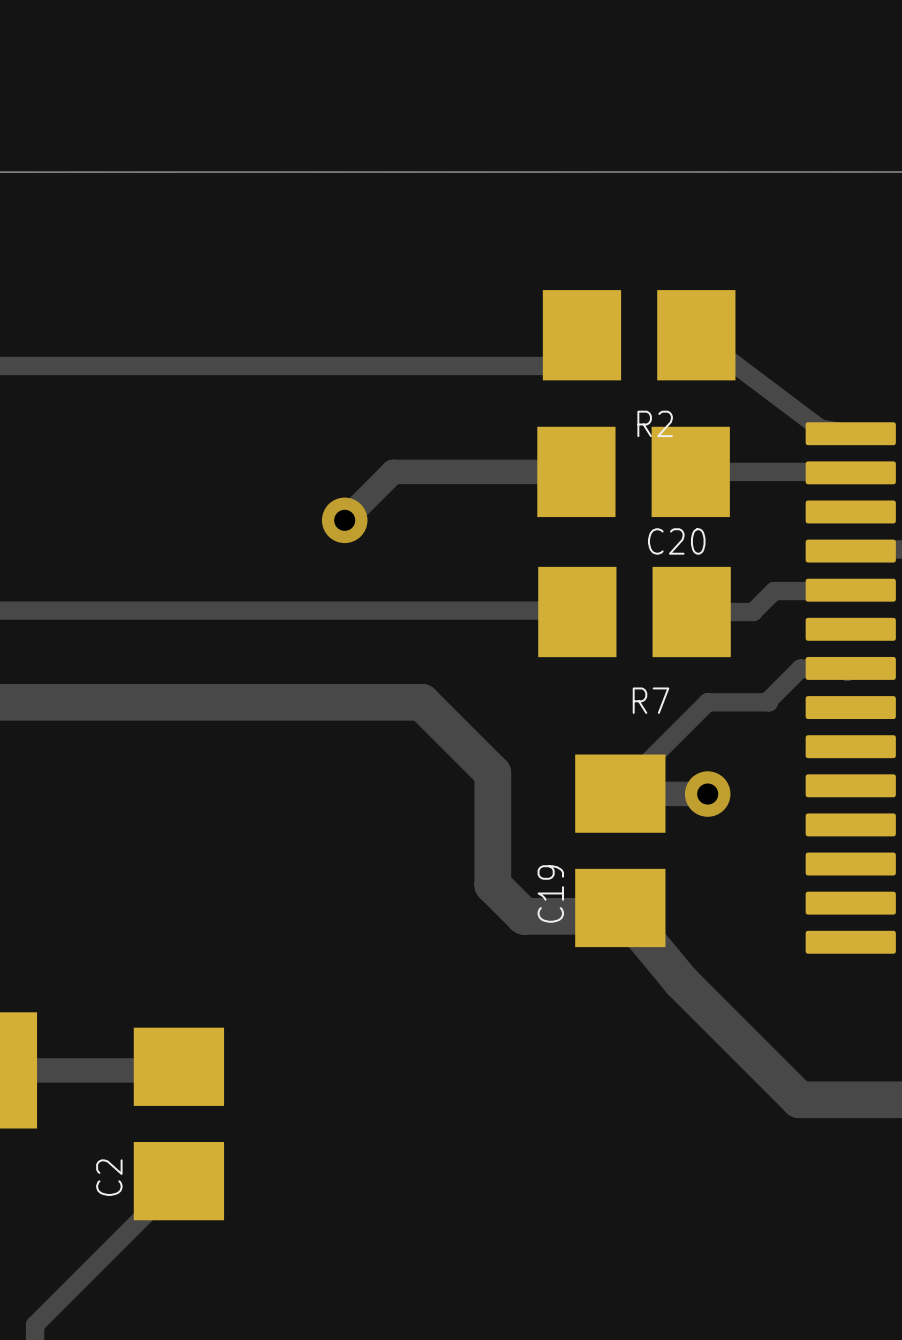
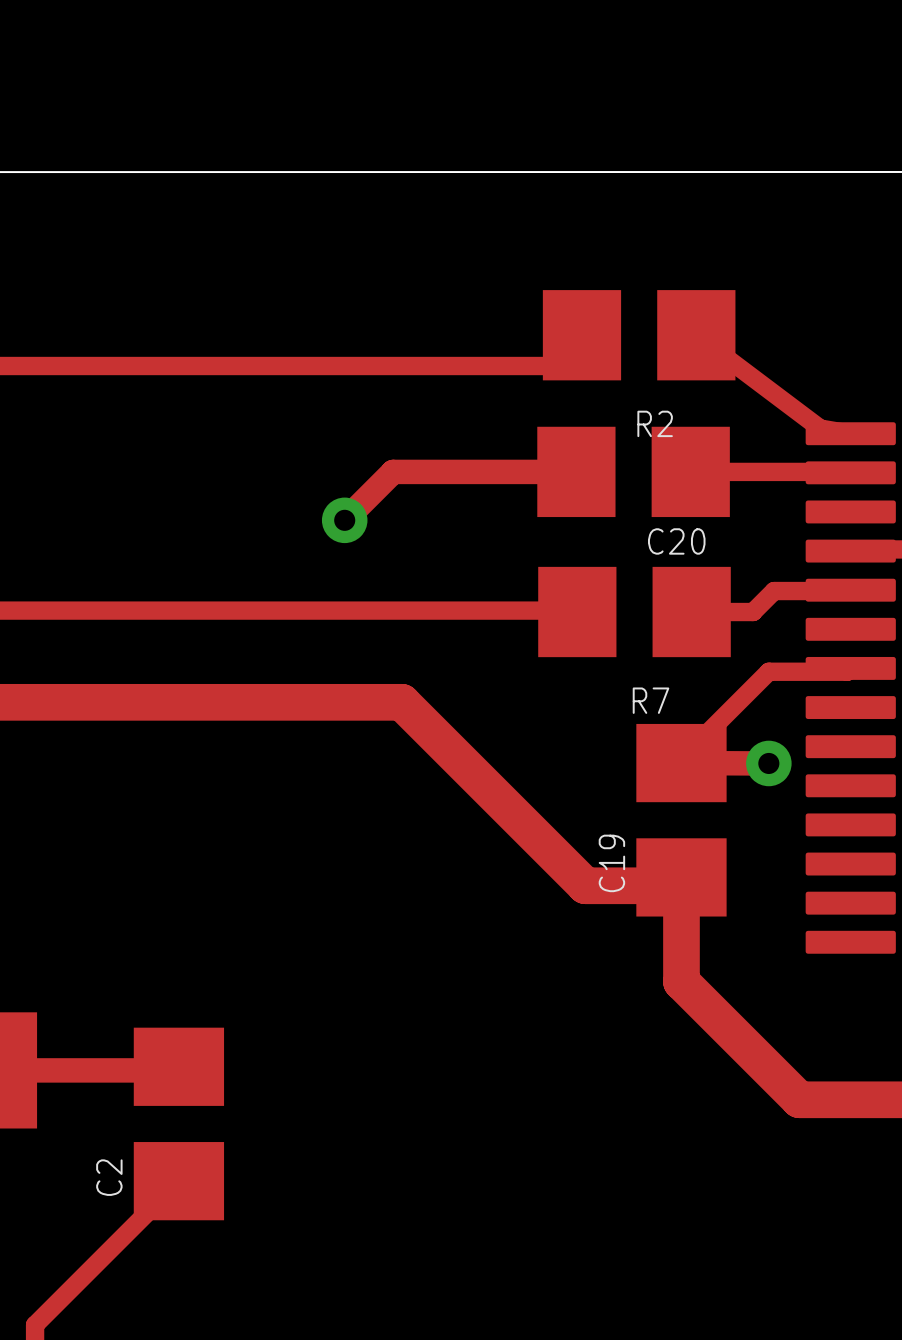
track: (847, 671) (844, 668) (800, 668) (768, 702) (707, 702) (620, 789) (620, 793) (707, 794) -> (847, 671) (768, 671) (681, 759) (681, 763) (768, 763)
track: (401, 702) (421, 702) (492, 773) (492, 884) (524, 916) (611, 916) (620, 907) (681, 981) -> (401, 702) (585, 885) (673, 885) (681, 877) (681, 981)
via position: (707, 794) -> (768, 763)
C19 position: (620, 850) -> (681, 820)

